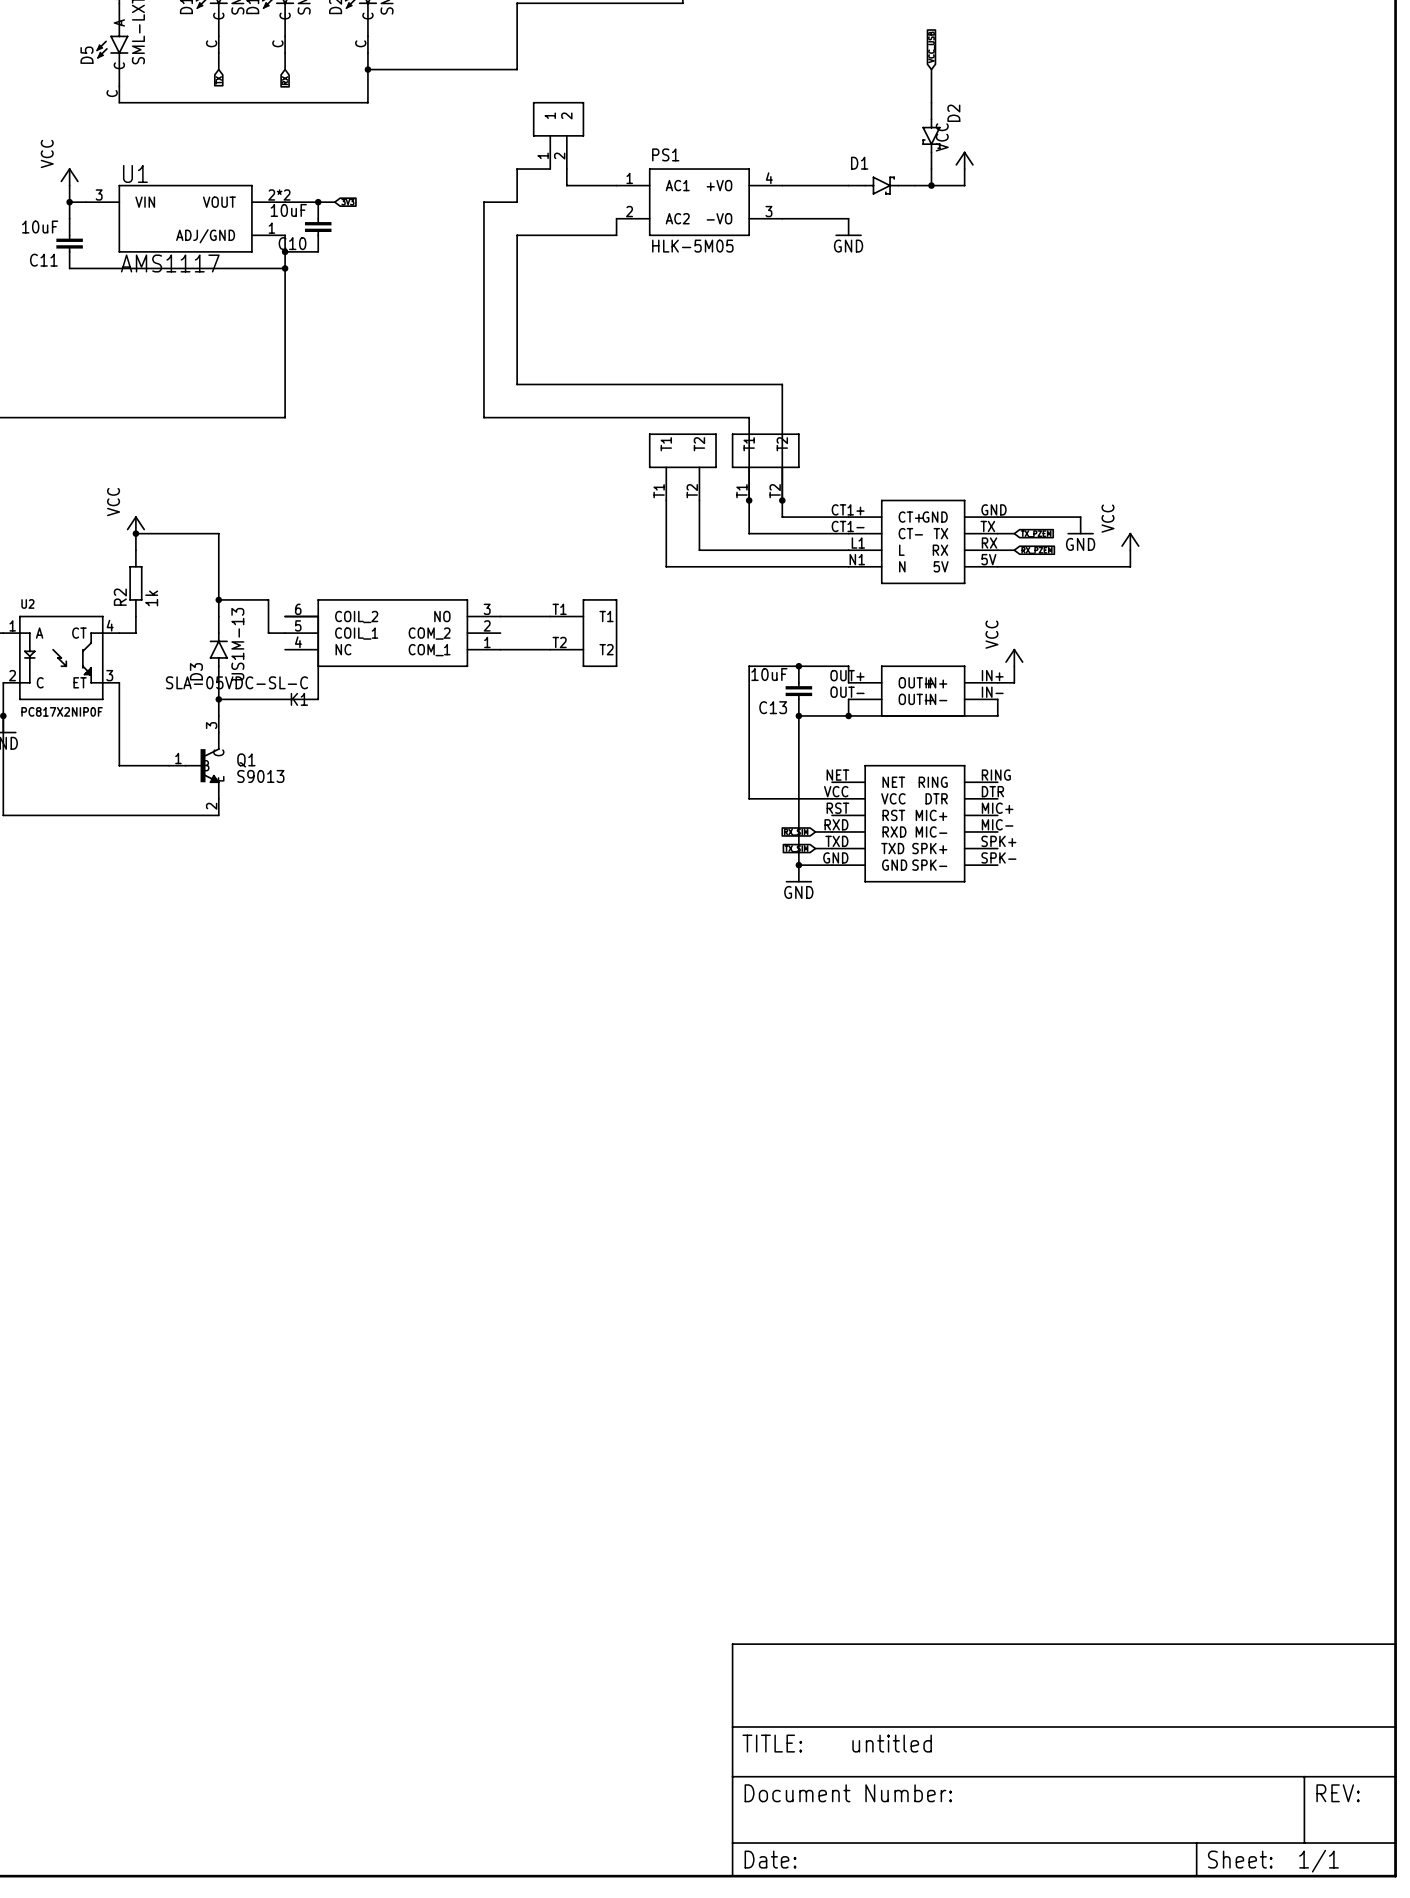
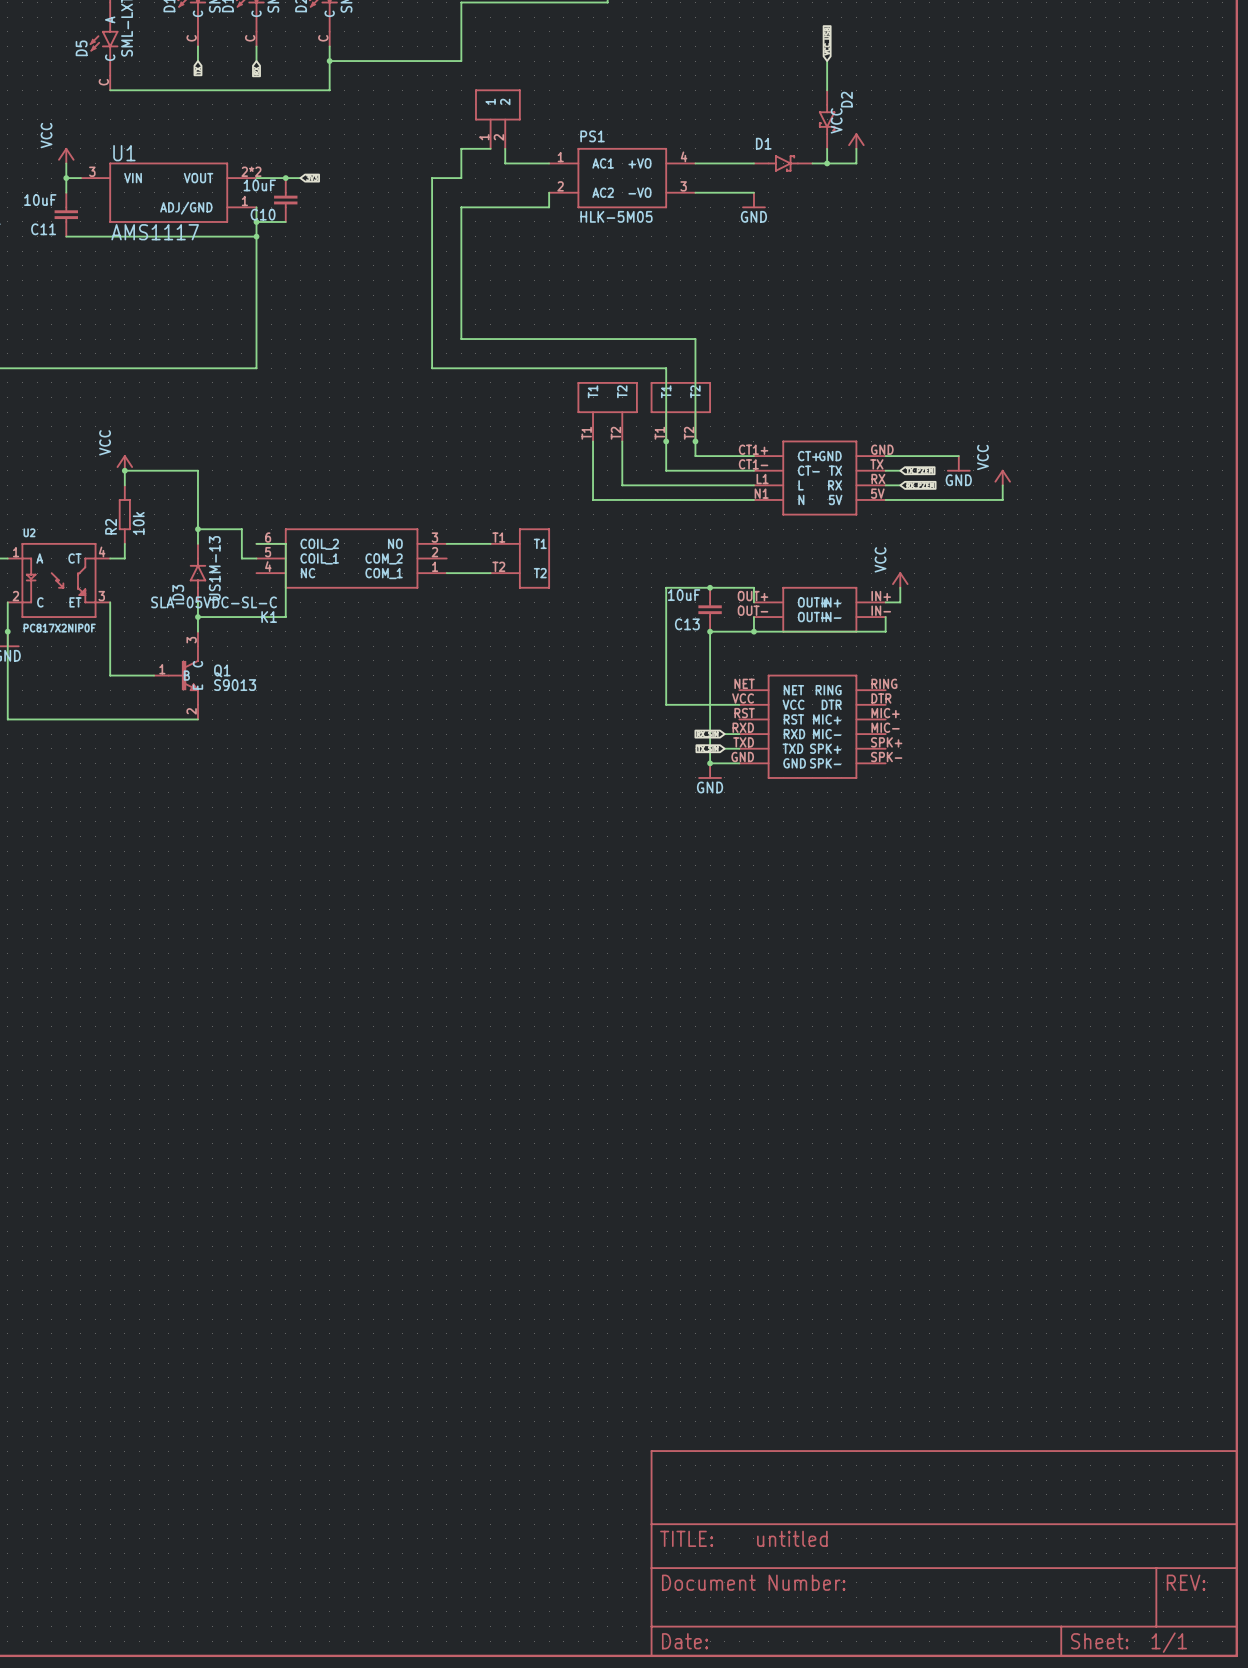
R2 value: 1k (151, 598) -> 10k (138, 523)

